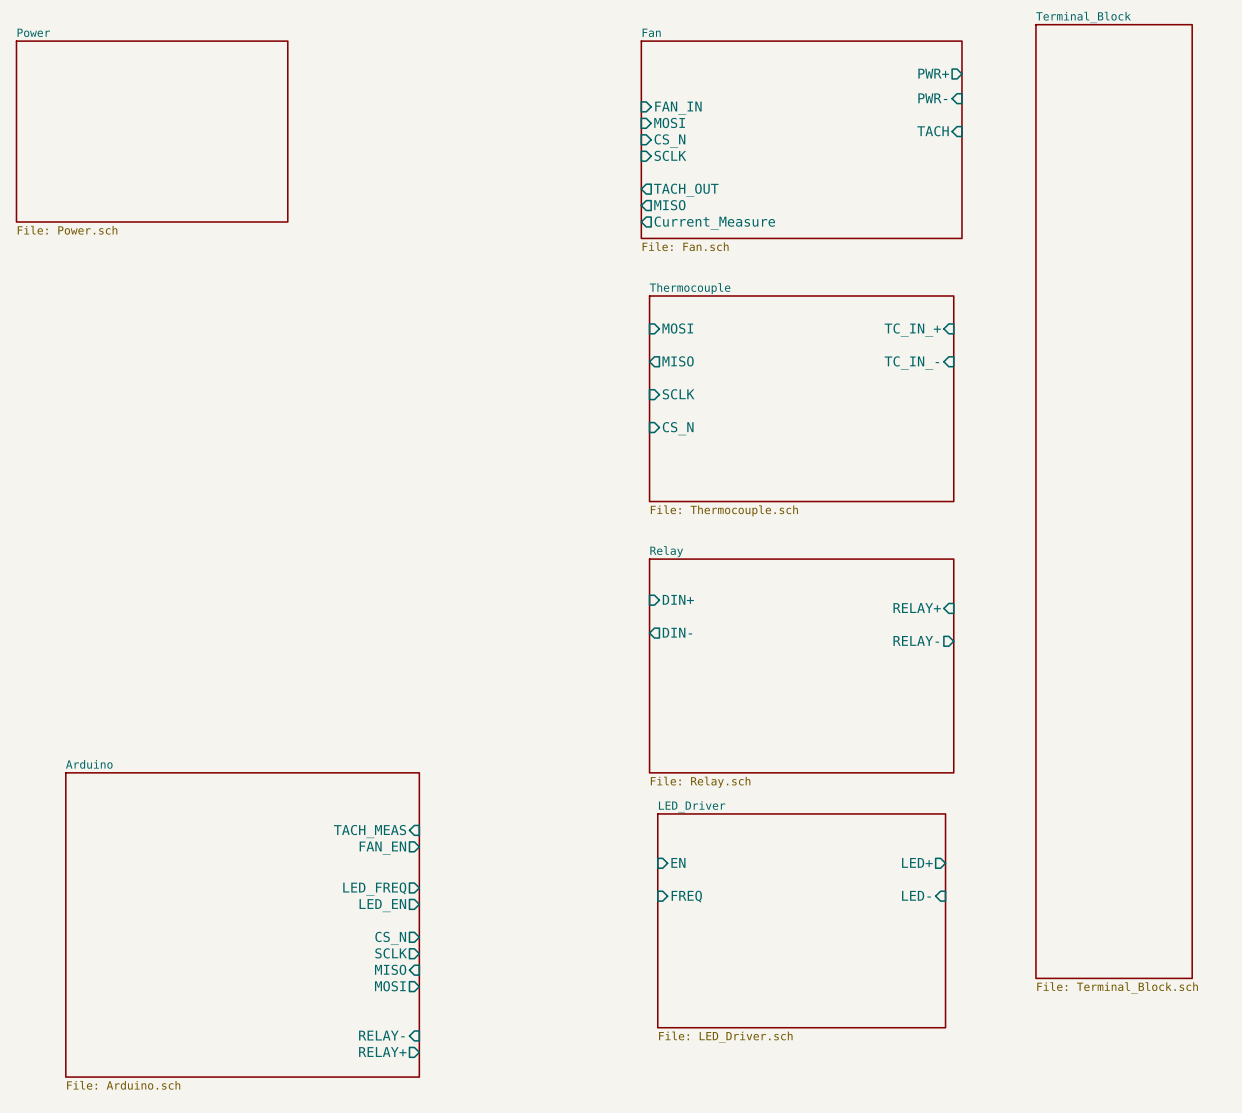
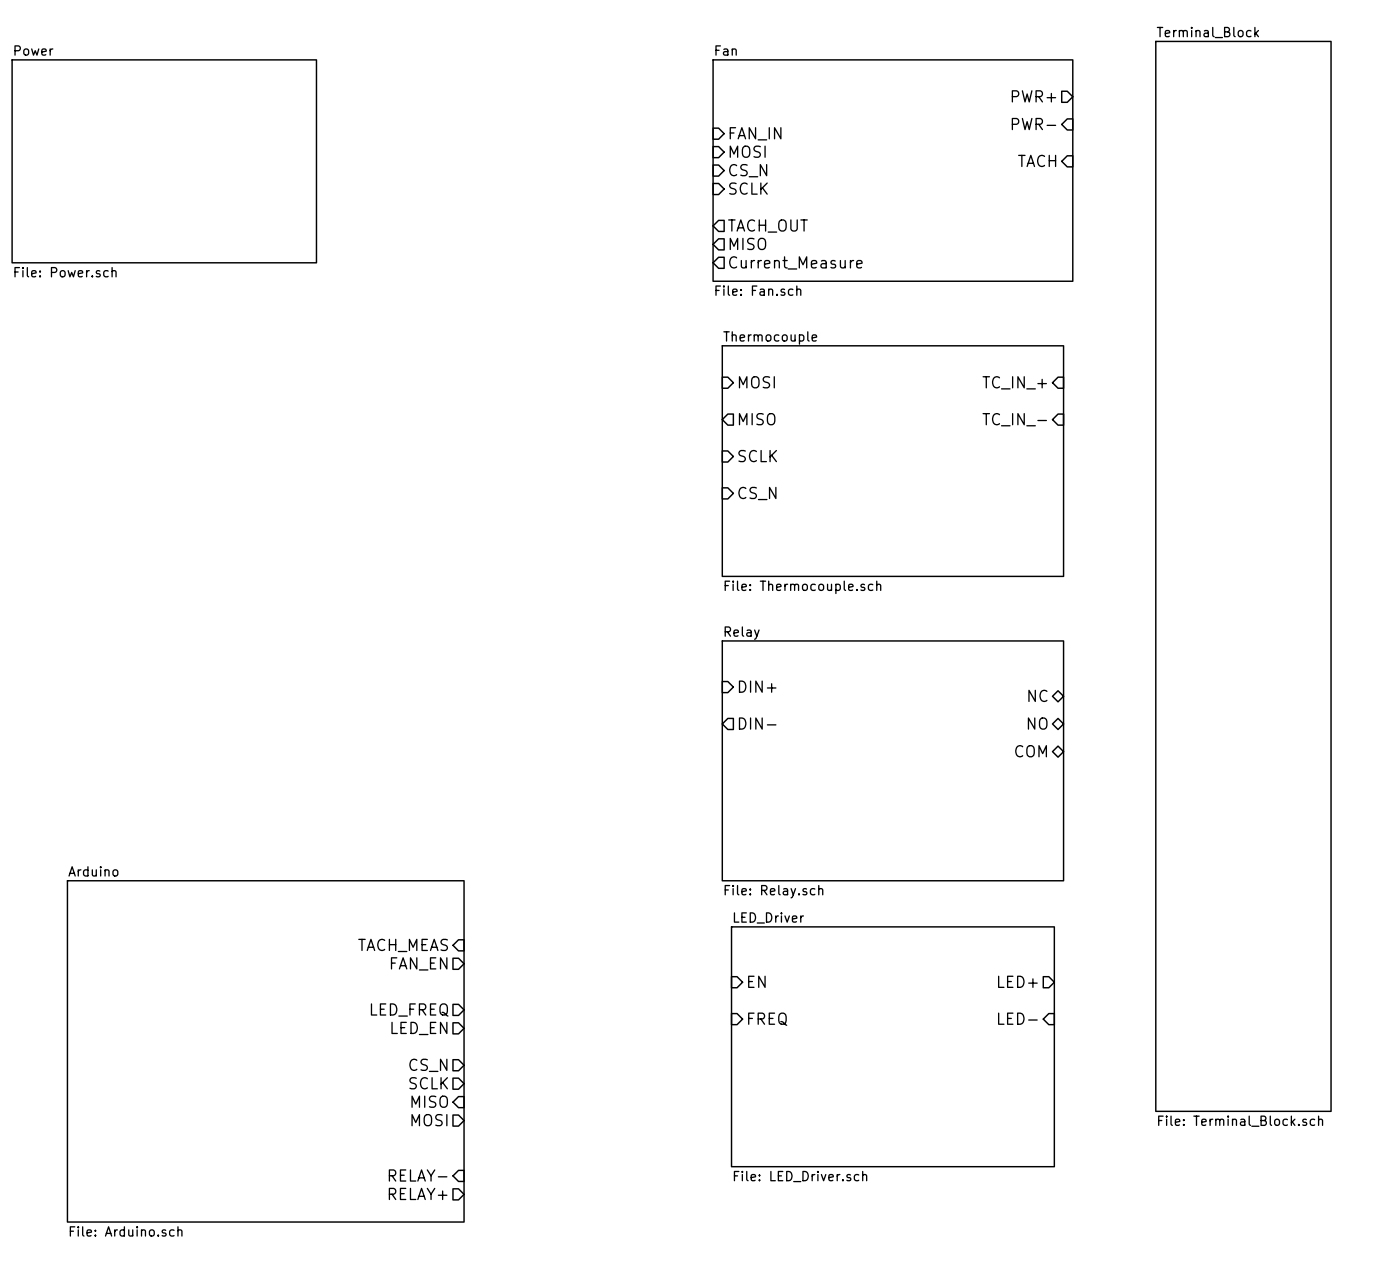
sheet pin shape: input (917, 608) -> bidirectional (1037, 695)
sheet pin: RELAY+ (917, 608) -> NC (1037, 695)
sheet pin: none -> NO (1037, 723)
sheet pin: RELAY- (916, 640) -> none
sheet pin: none -> COM (1031, 751)

